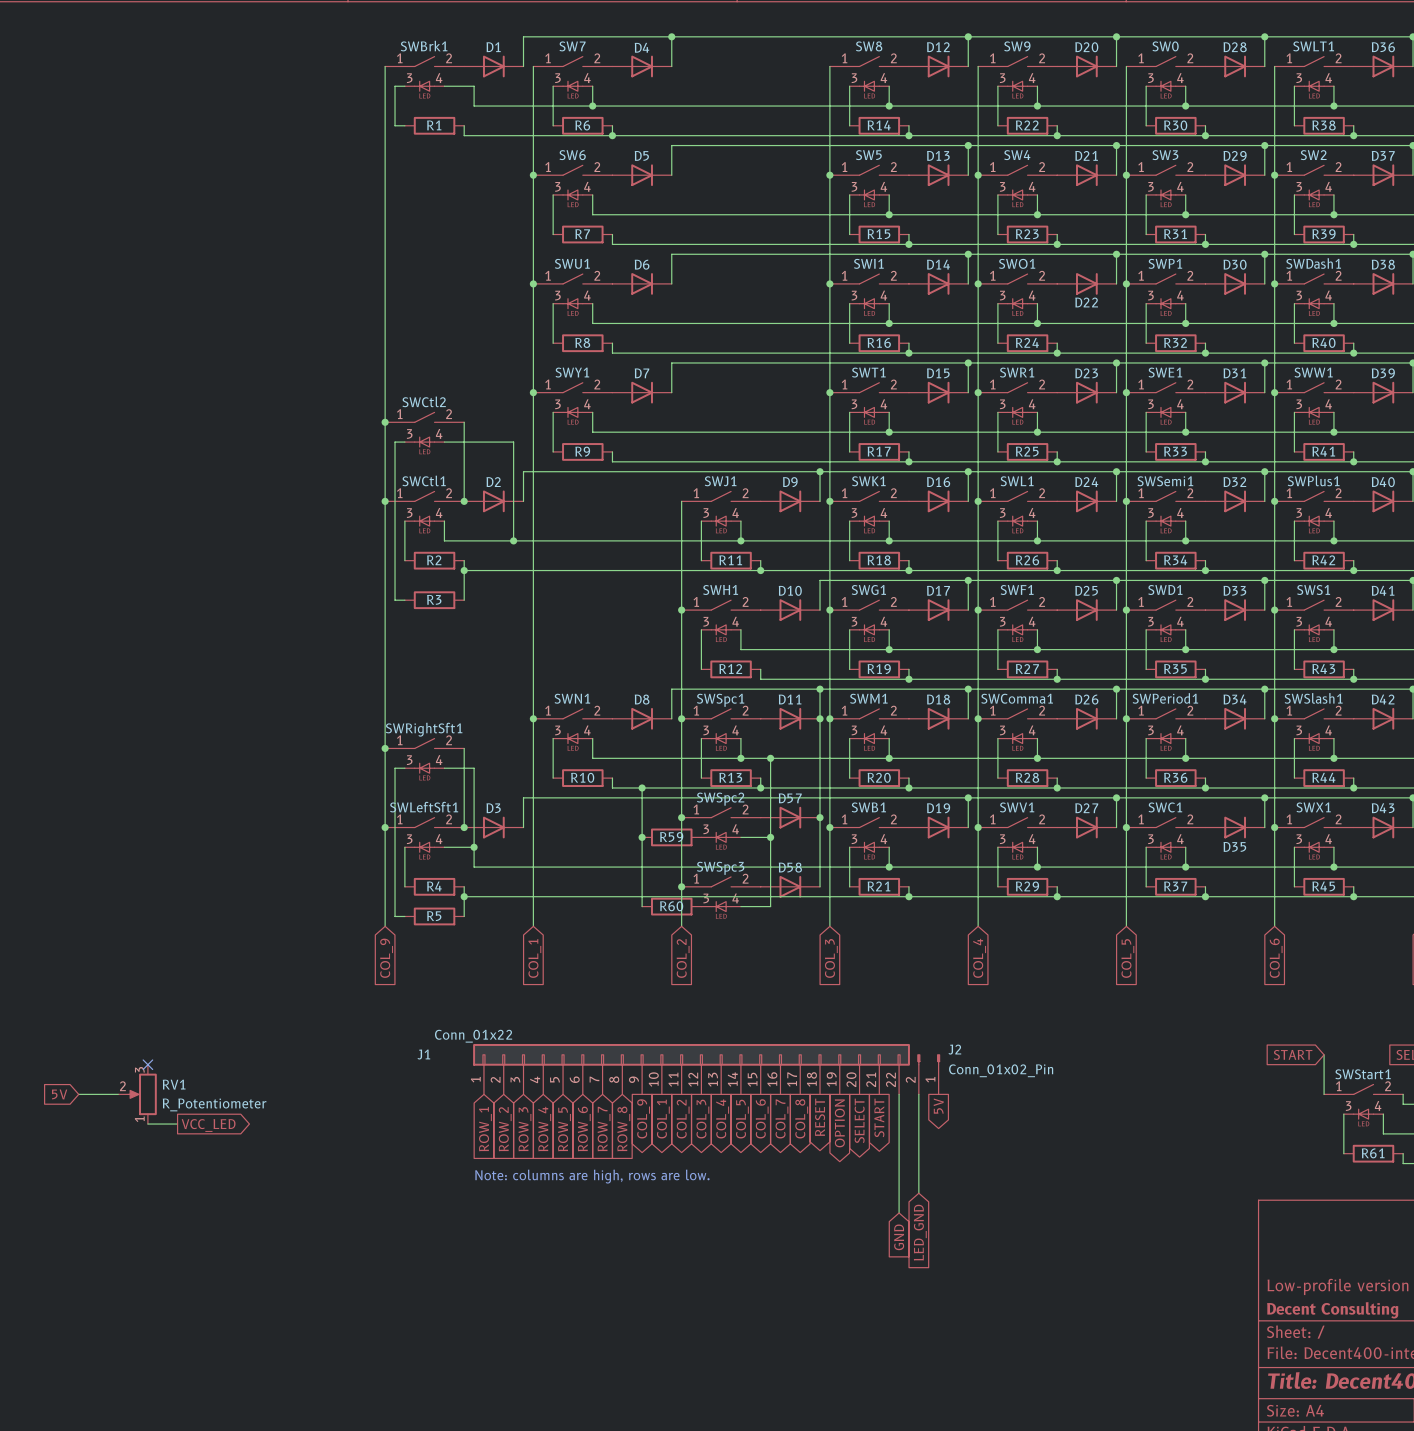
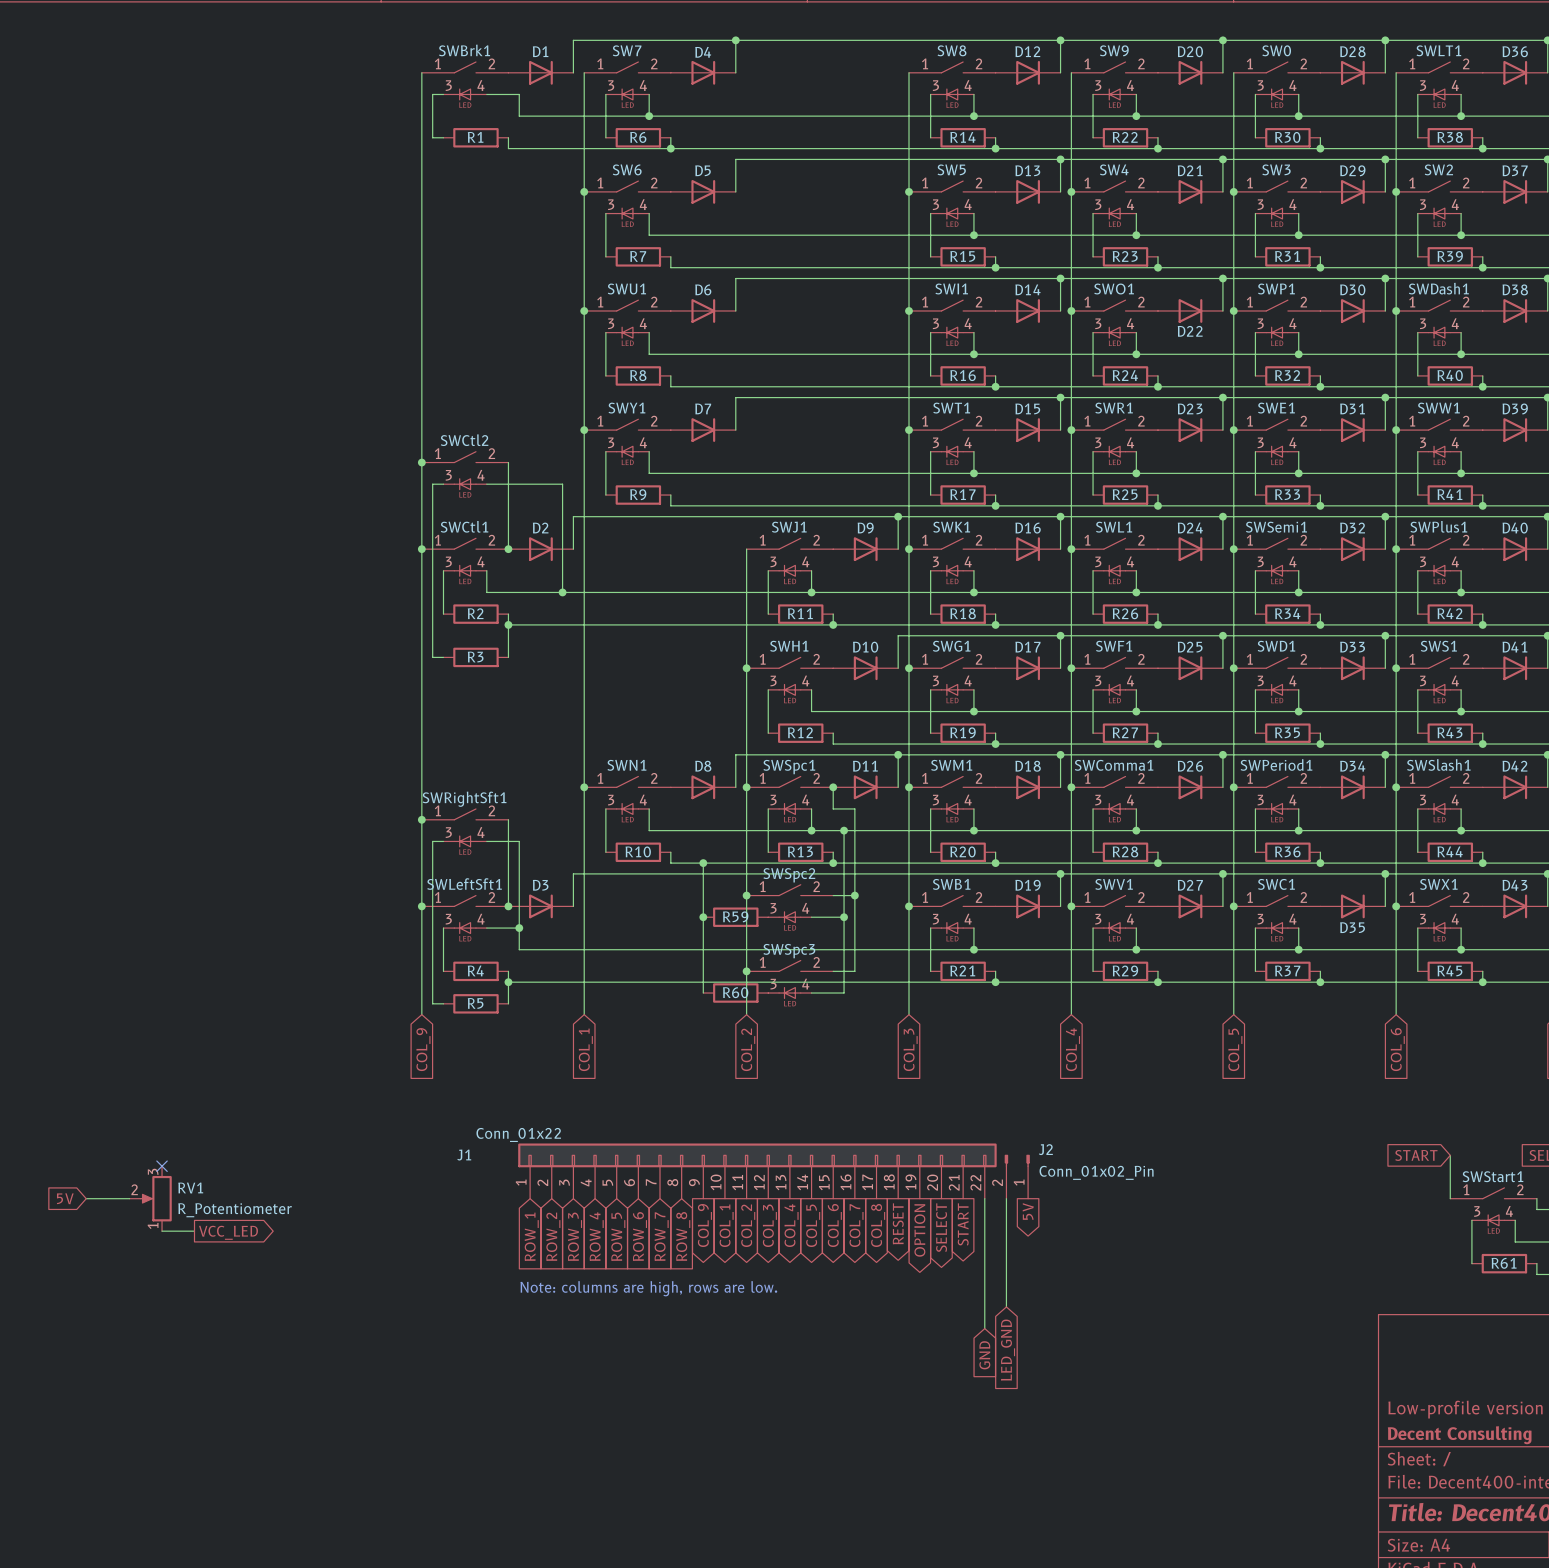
wire: none -> (833, 787) (833, 808) (854, 808) (854, 971) (833, 971)
junction: none -> (833, 787)
wire: (820, 718) (820, 886) -> none
junction: (820, 718) -> none
D57: (790, 817) -> none
junction position: (820, 817) -> (854, 895)
D58: (790, 886) -> none

